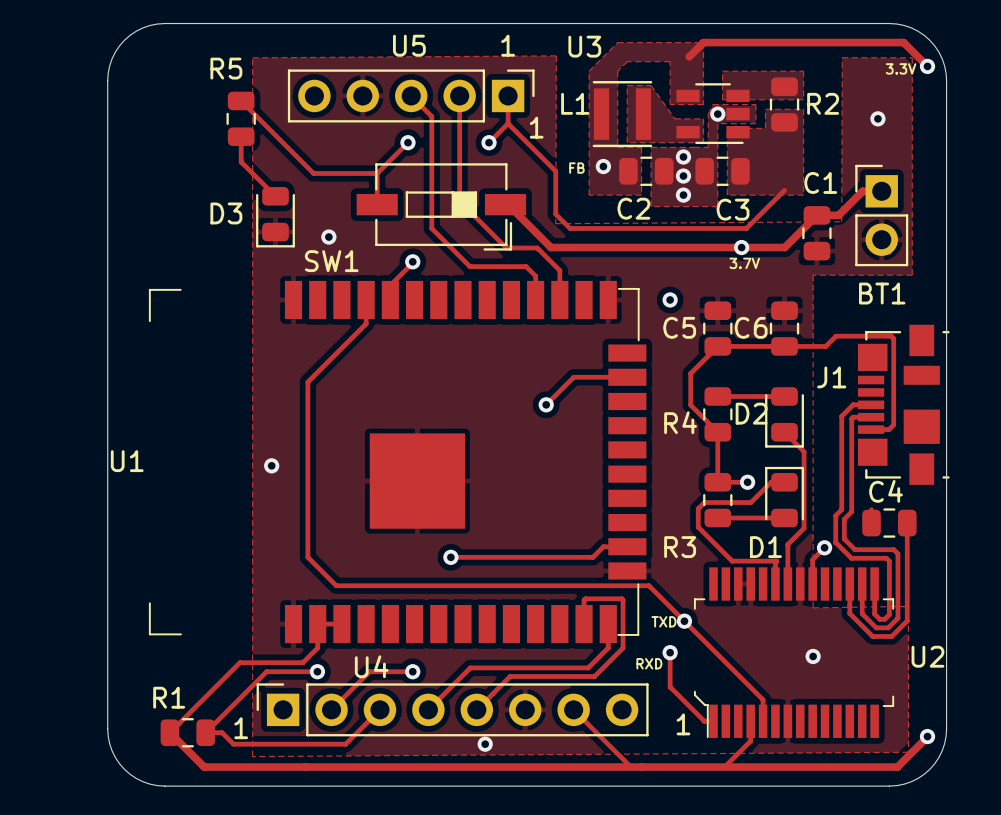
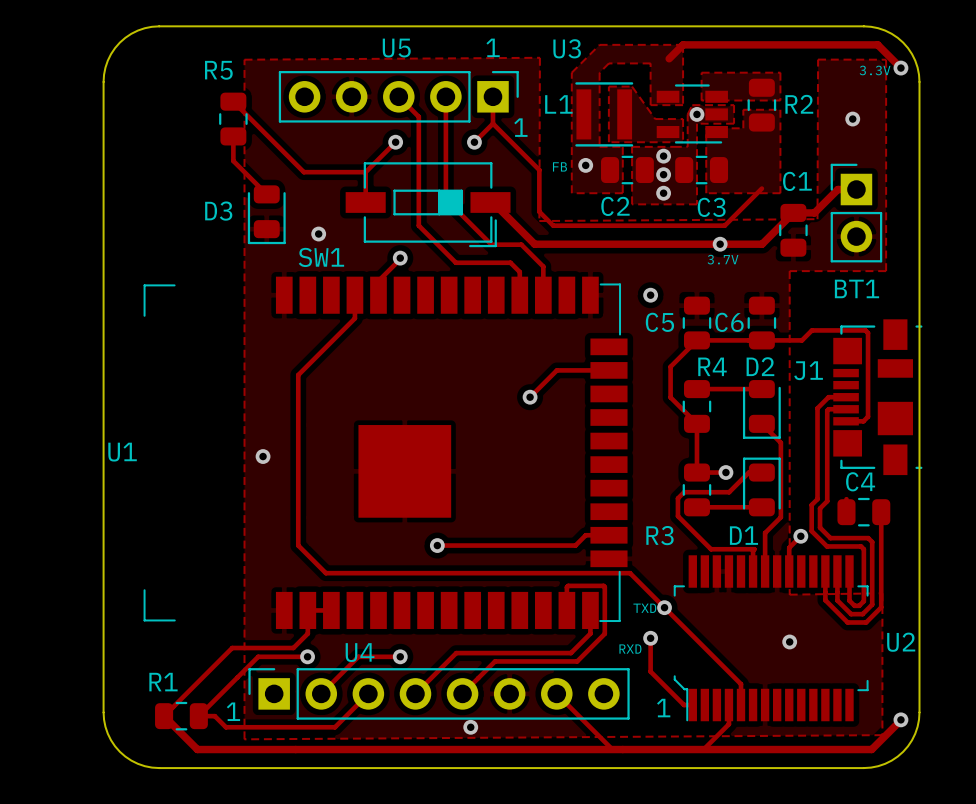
D2 name position: D2 (751, 413) -> D2 (760, 366)
R4 name position: R4 (680, 422) -> R4 (712, 366)

